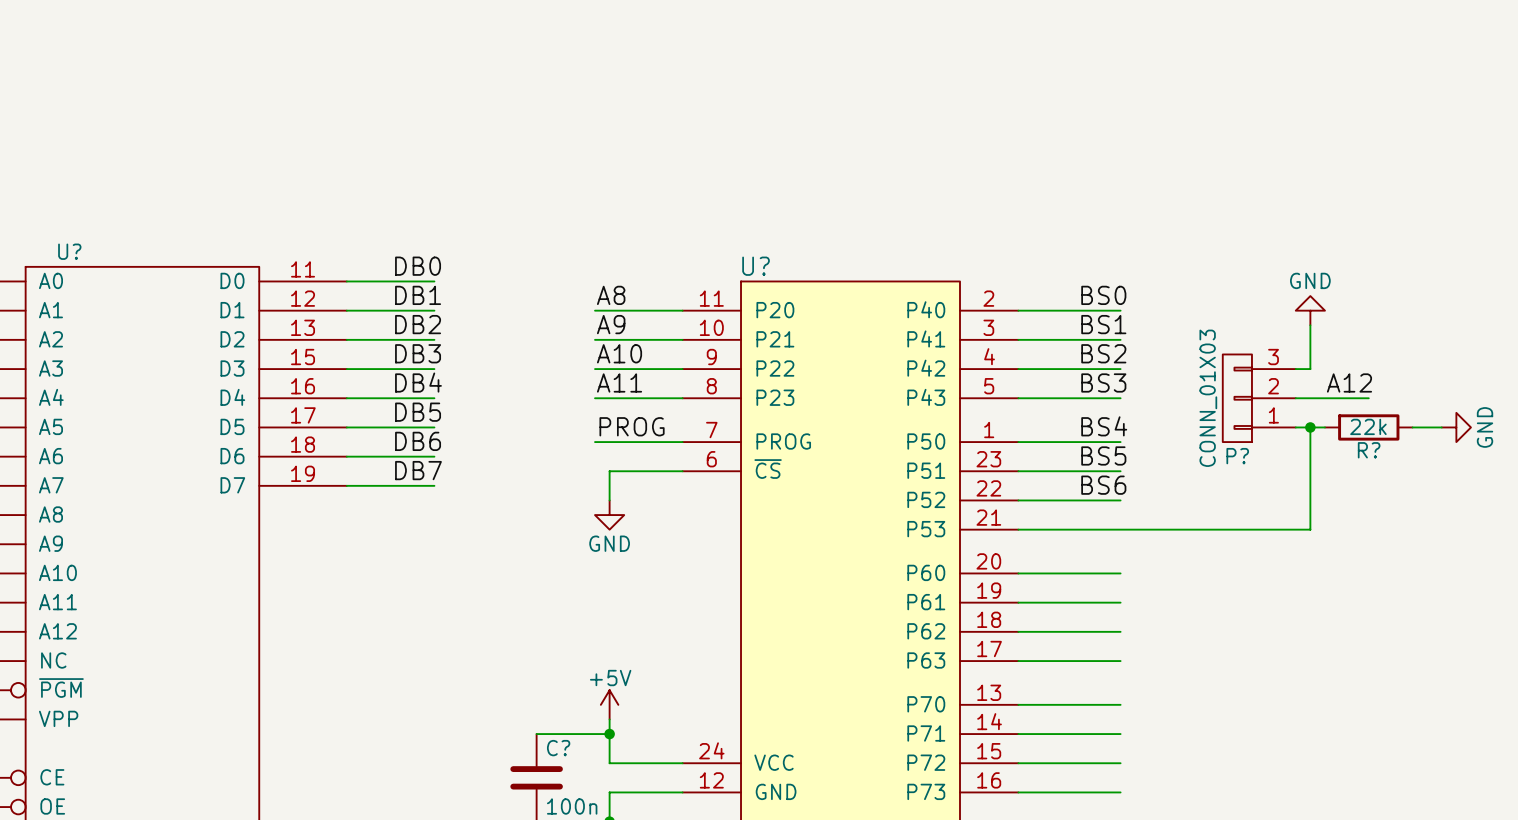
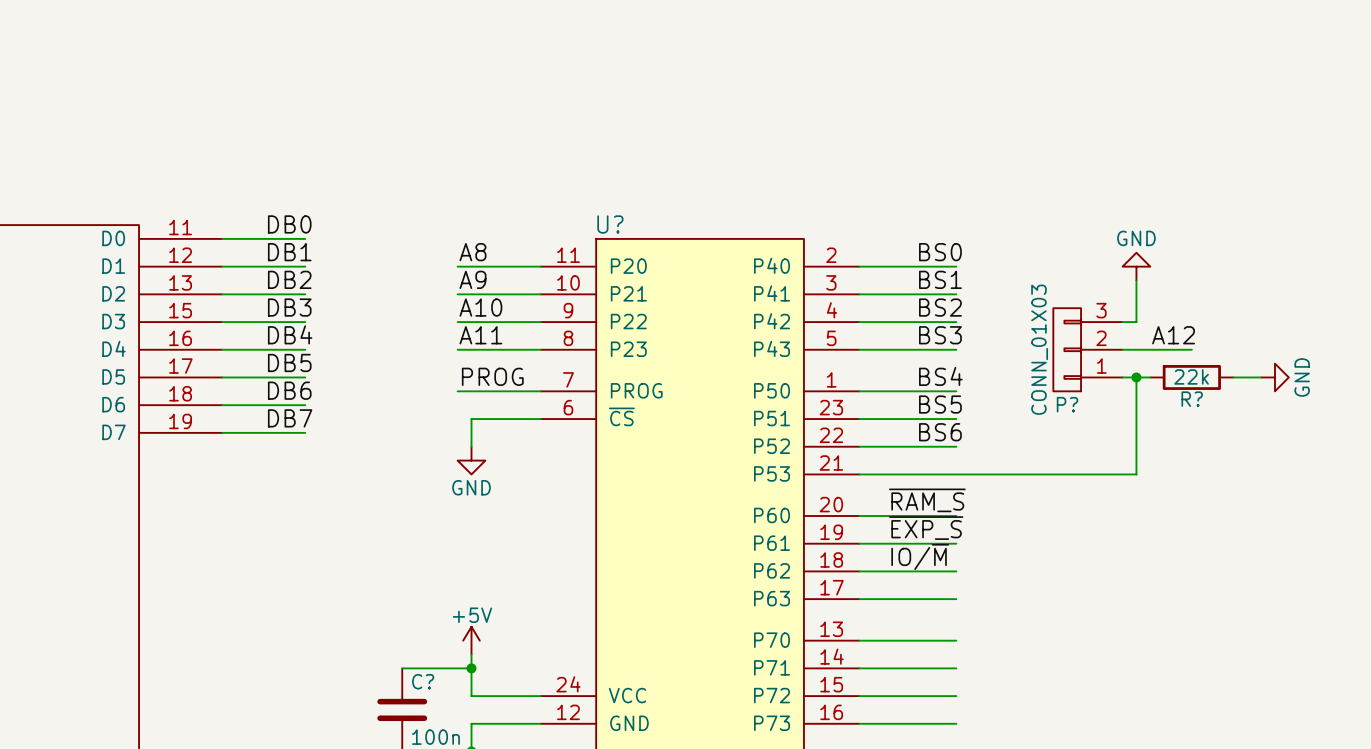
label: none -> ~{RAM_S} (927, 500)
label: none -> ~{EXP_S} (926, 528)
label: none -> IO/~{M} (920, 556)

